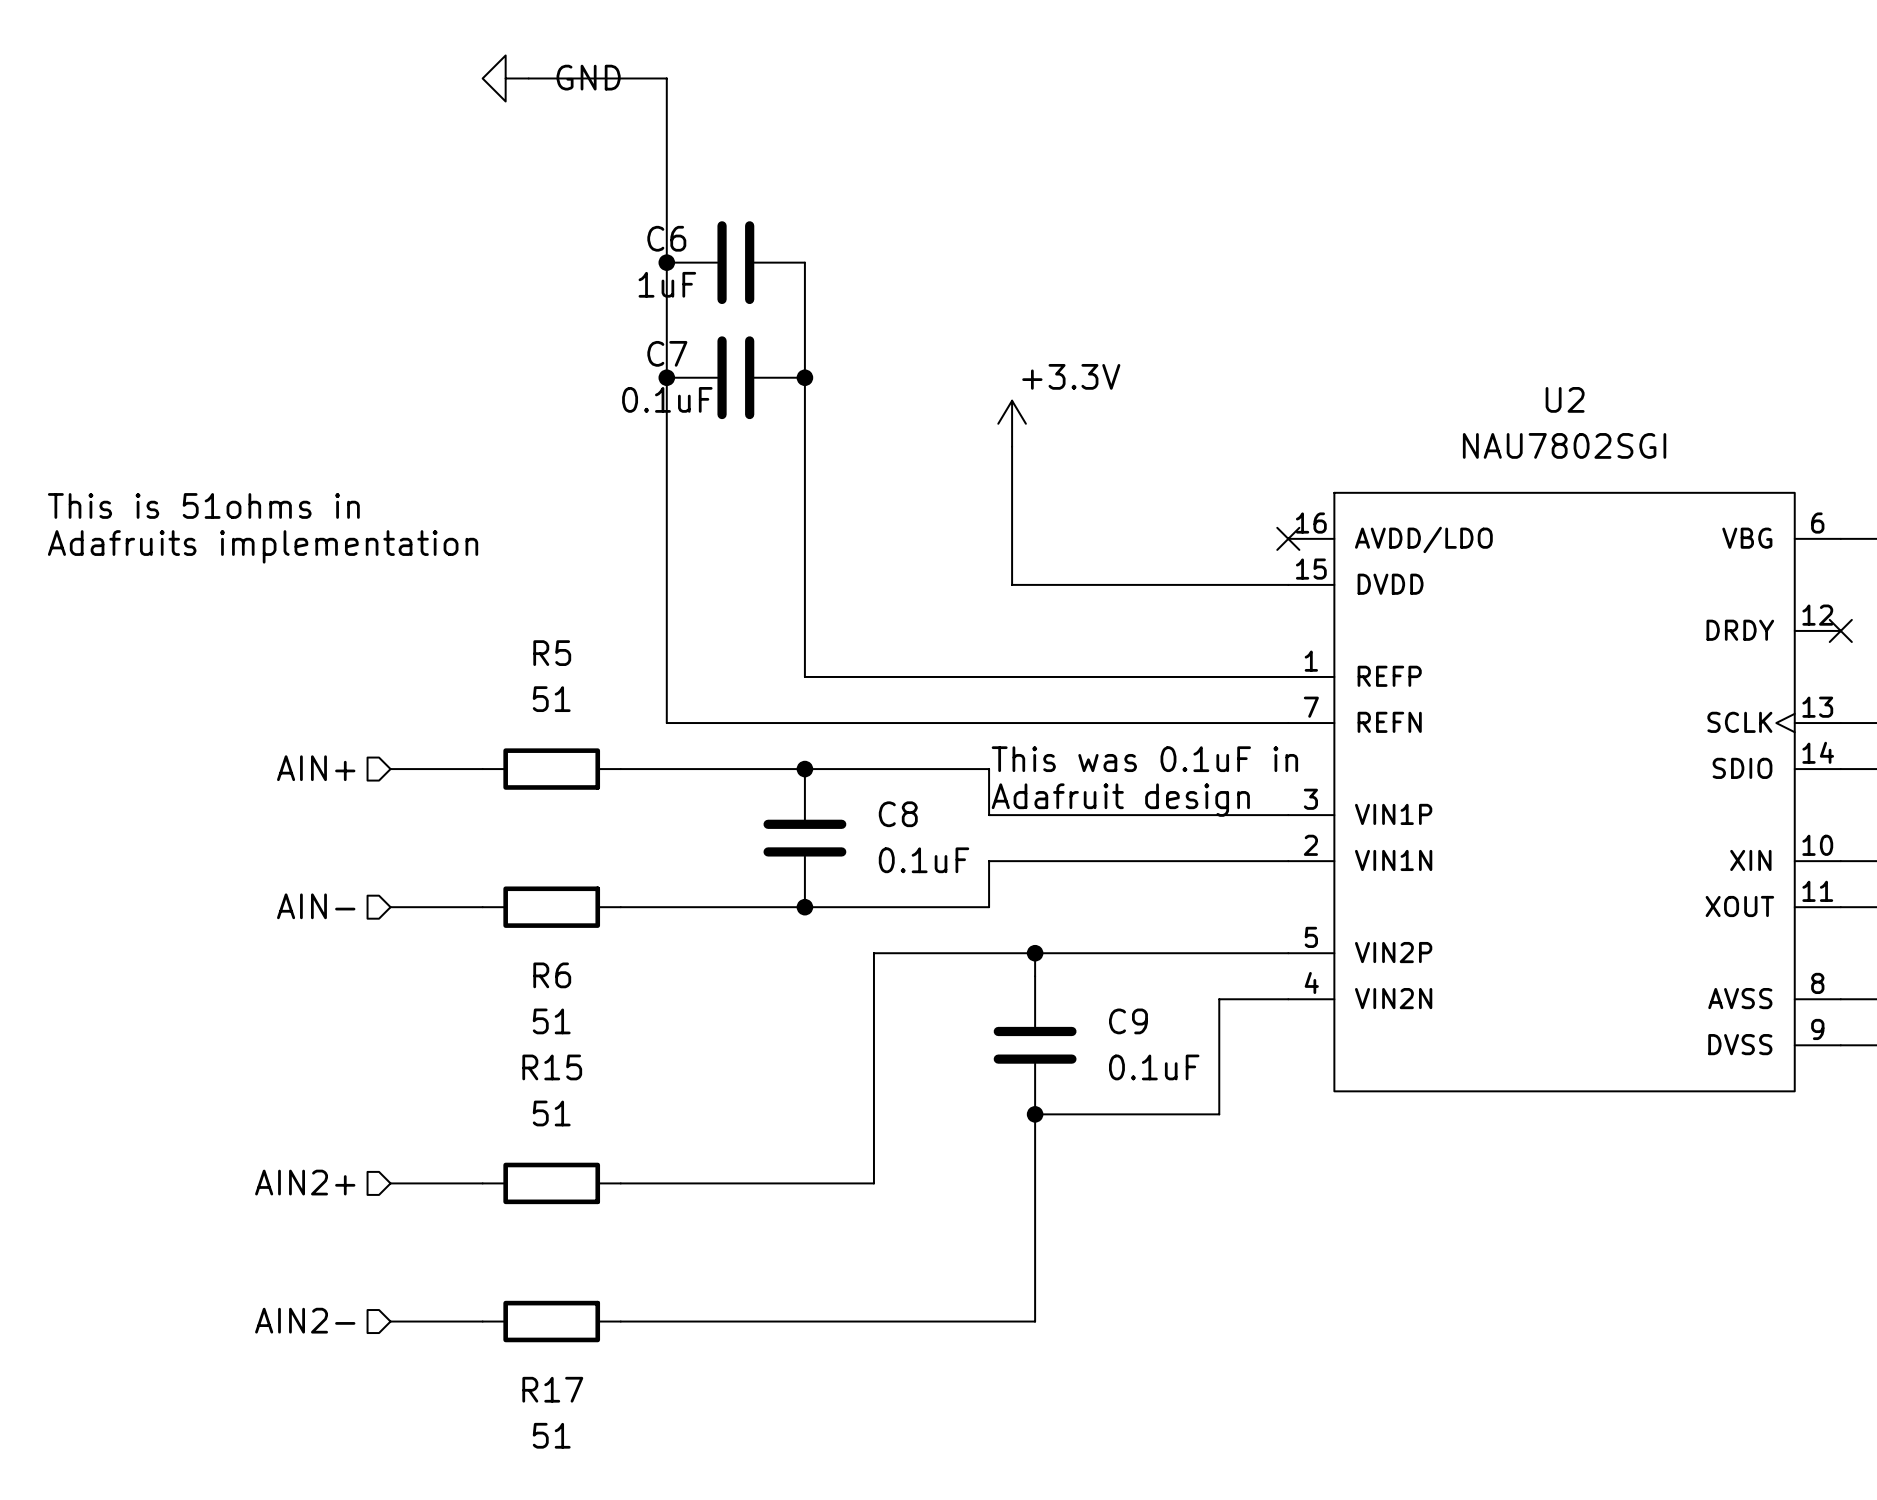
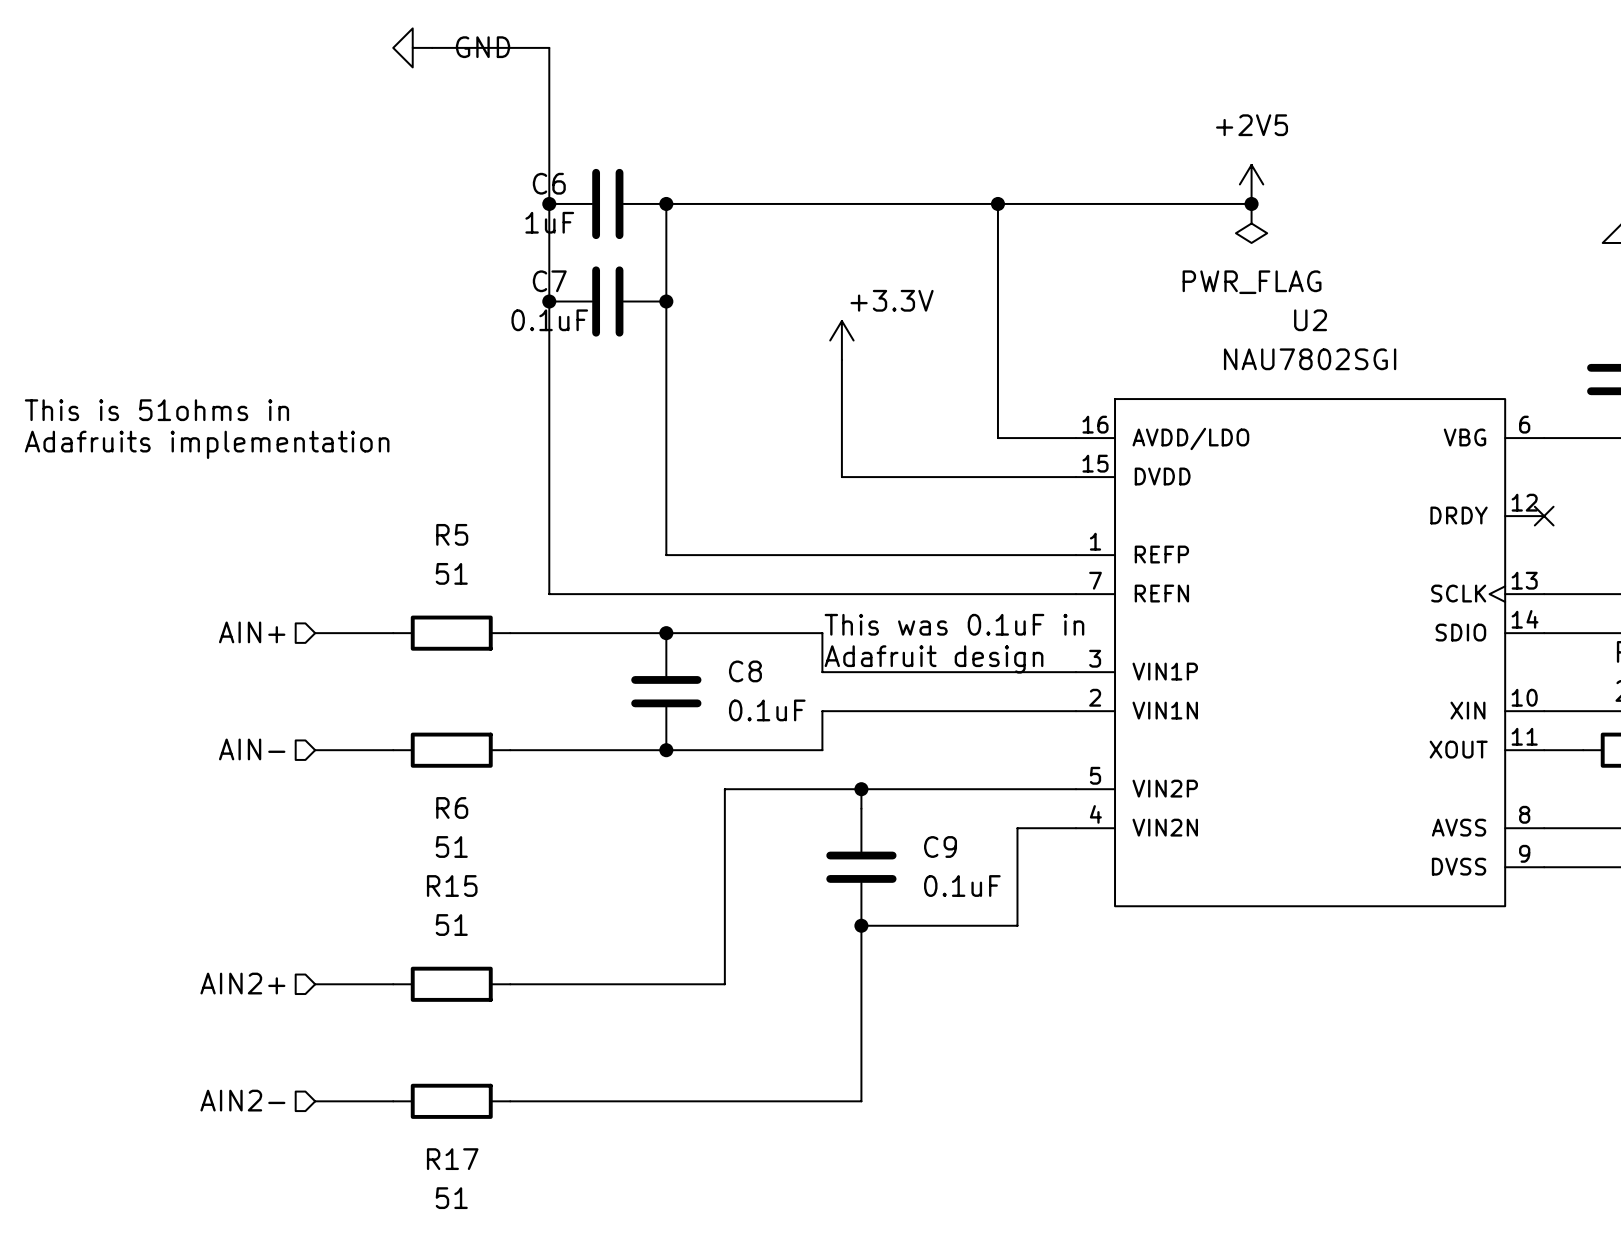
power symbol: none -> +2V5 (1251, 184)
wire: none -> (666, 203) (1251, 203)
junction: none -> (666, 203)
wire: none -> (997, 203) (997, 438) (1076, 438)
junction: none -> (997, 203)
junction: none -> (1251, 203)
power symbol: none -> PWR_FLAG (1251, 223)
no-connect mark: (1288, 538) -> none

